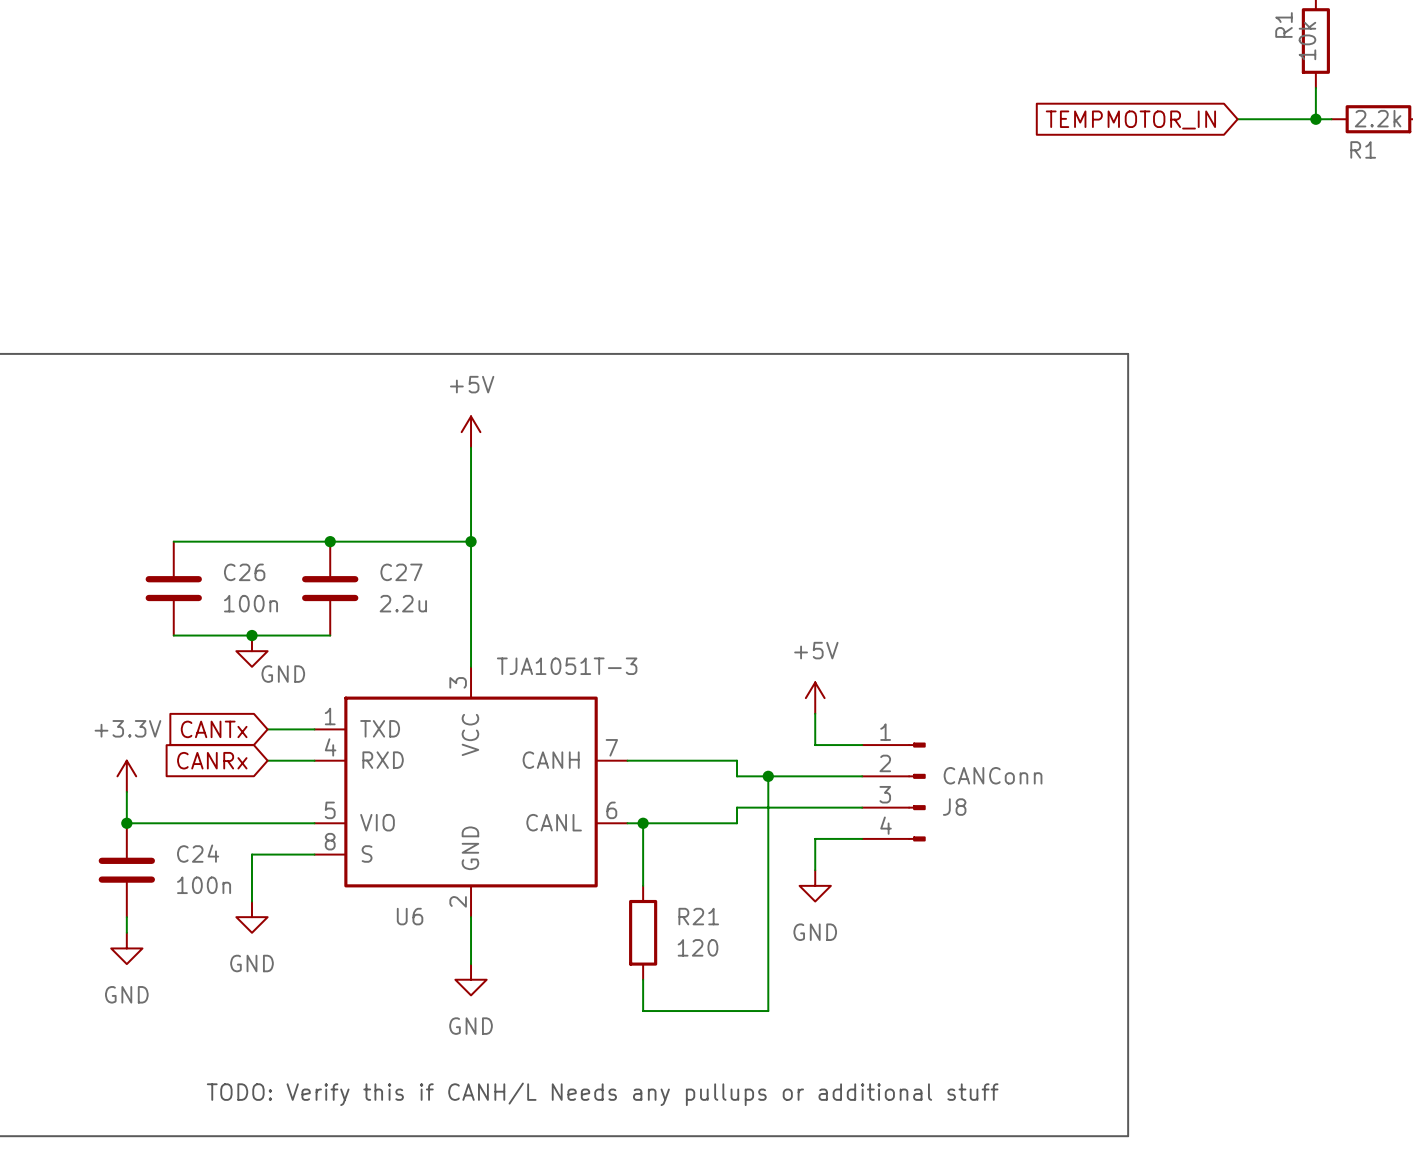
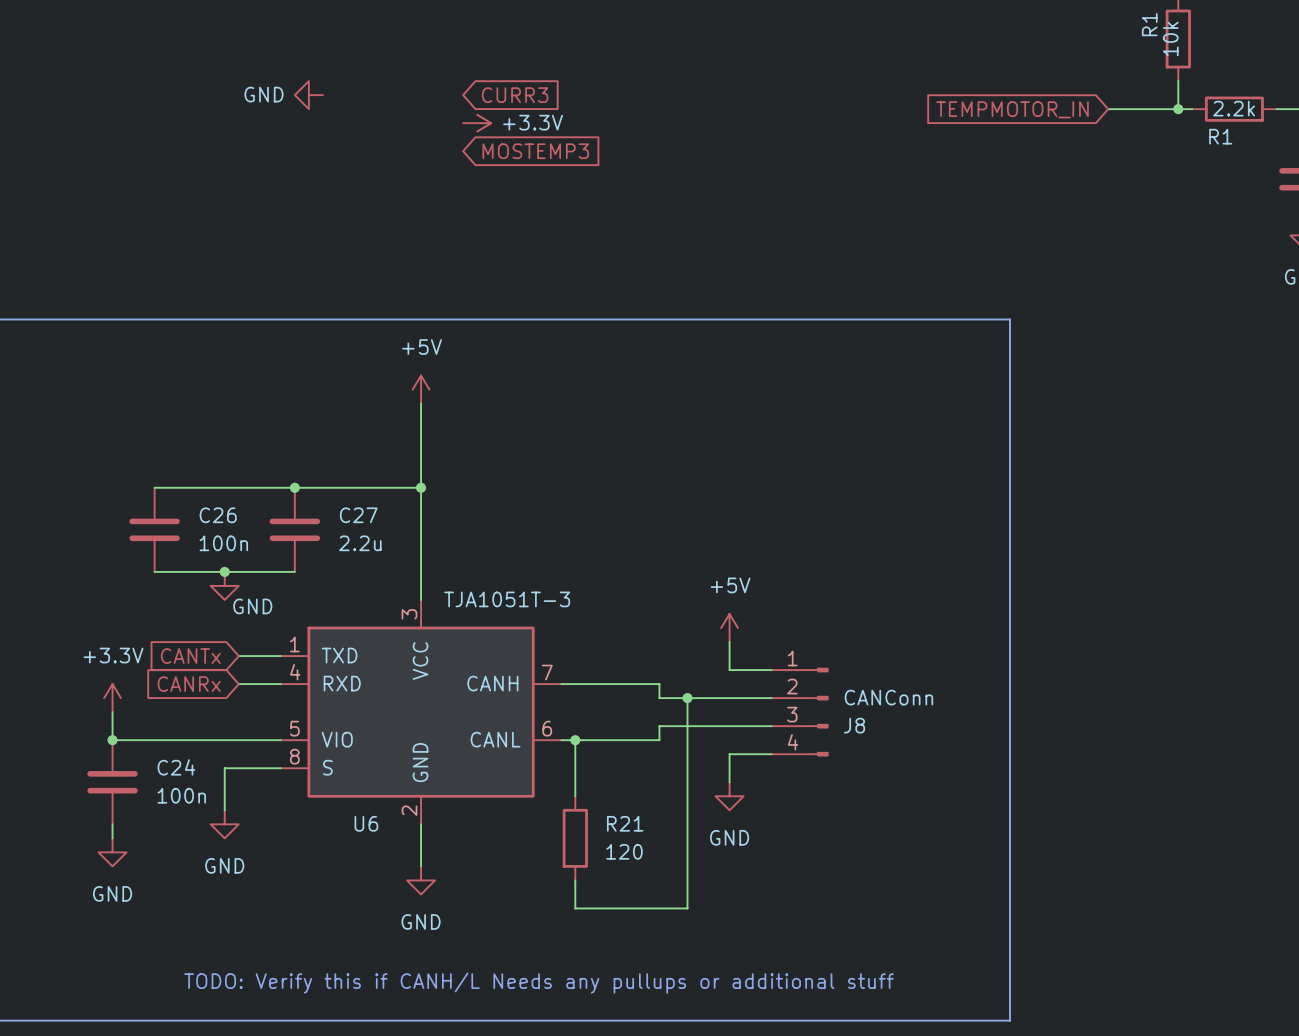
power symbol: none -> GND (308, 95)
global label: none -> CURR3 (515, 95)
power symbol: none -> +3.3V (477, 123)
global label: none -> MOSTEMP3 (535, 151)

